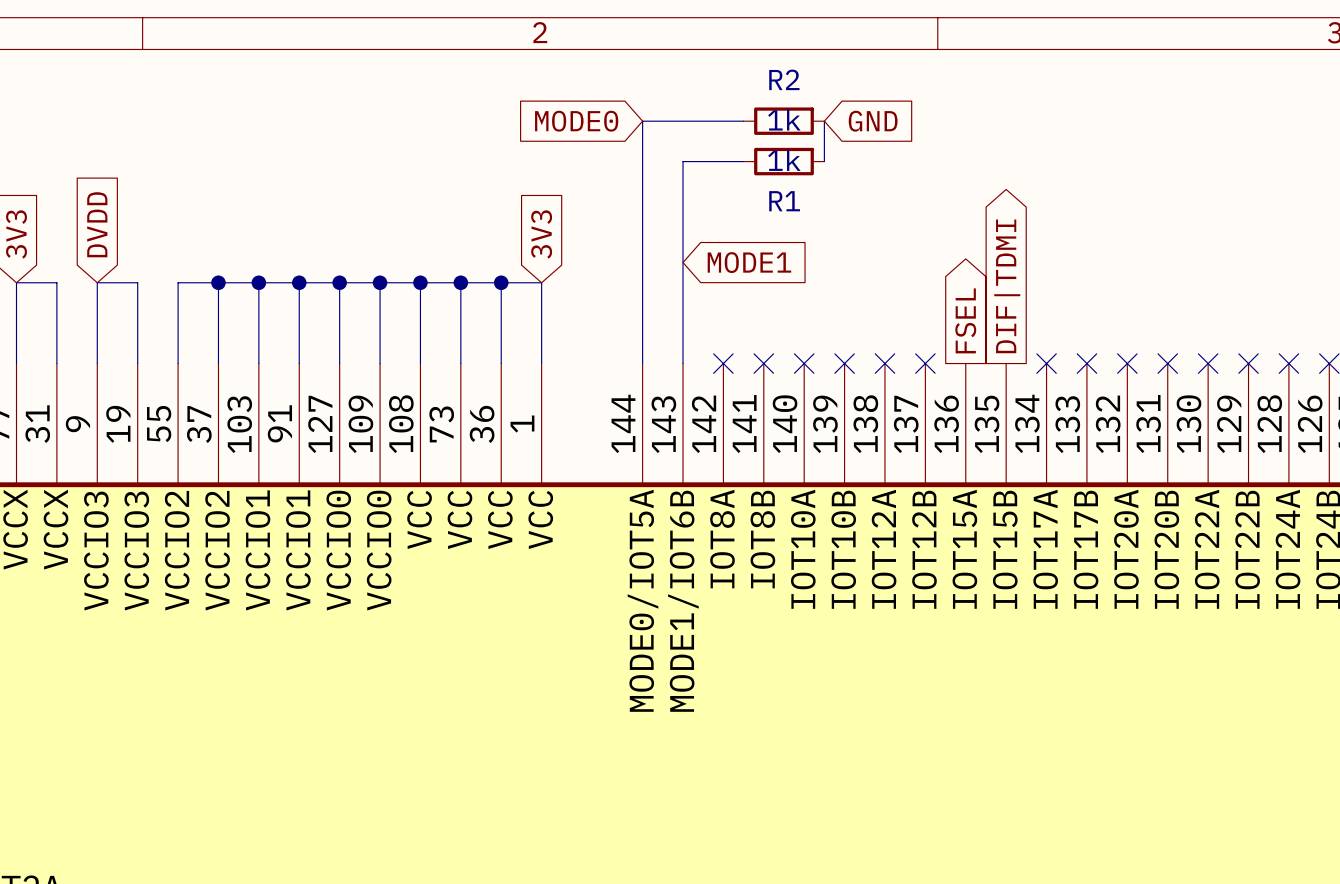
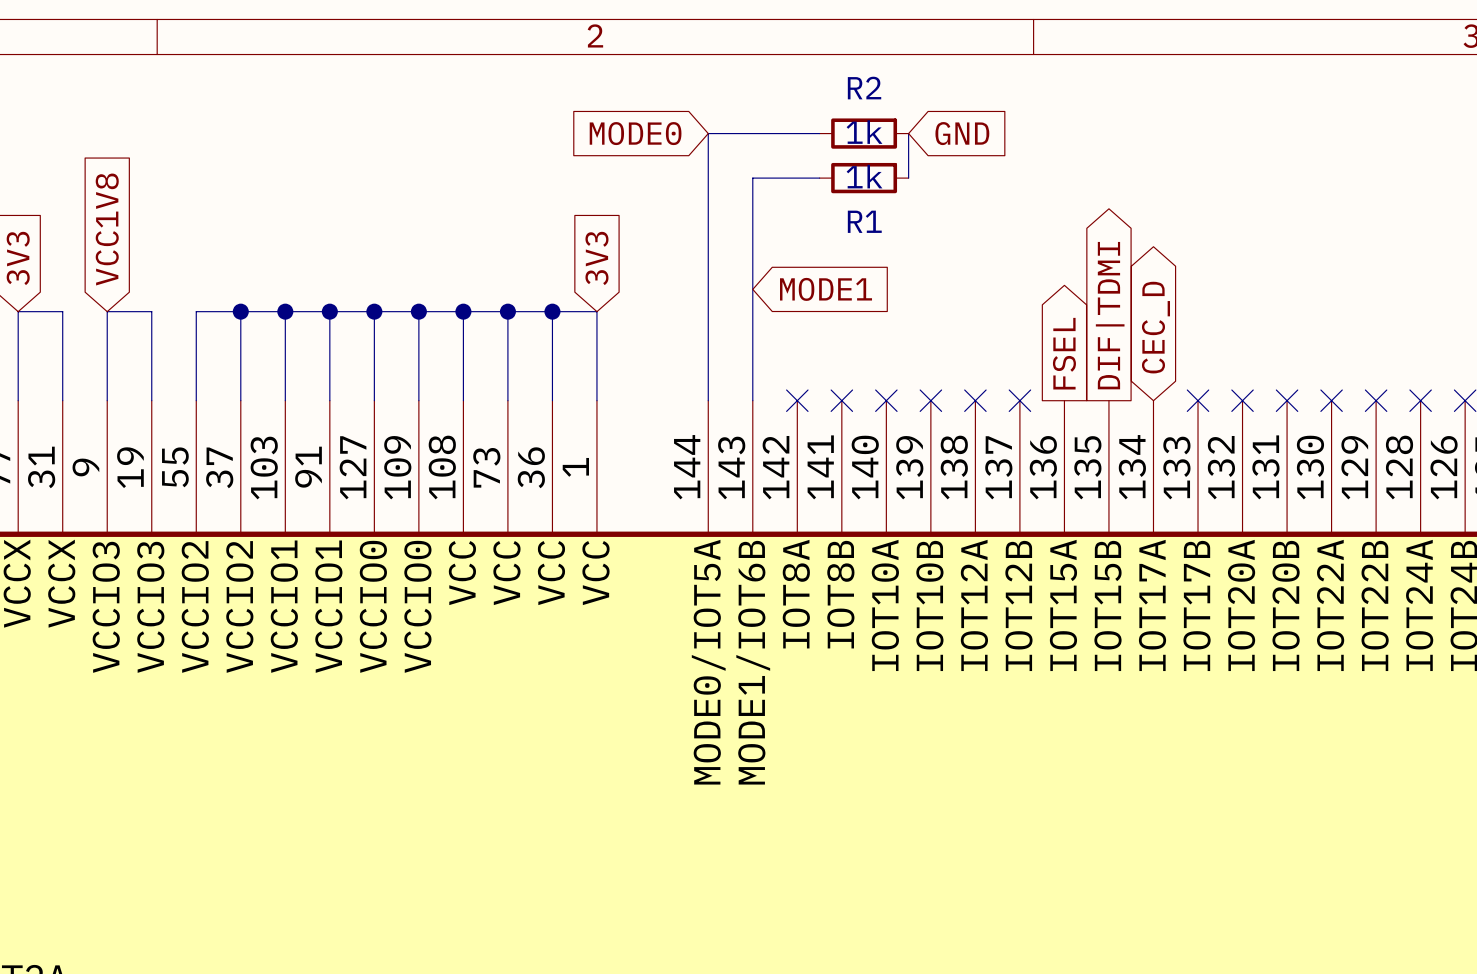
global label: DVDD (97, 224) -> VCC1V8 (107, 229)
global label: none -> CEC_D (1155, 327)
no-connect mark: (1046, 363) -> none

